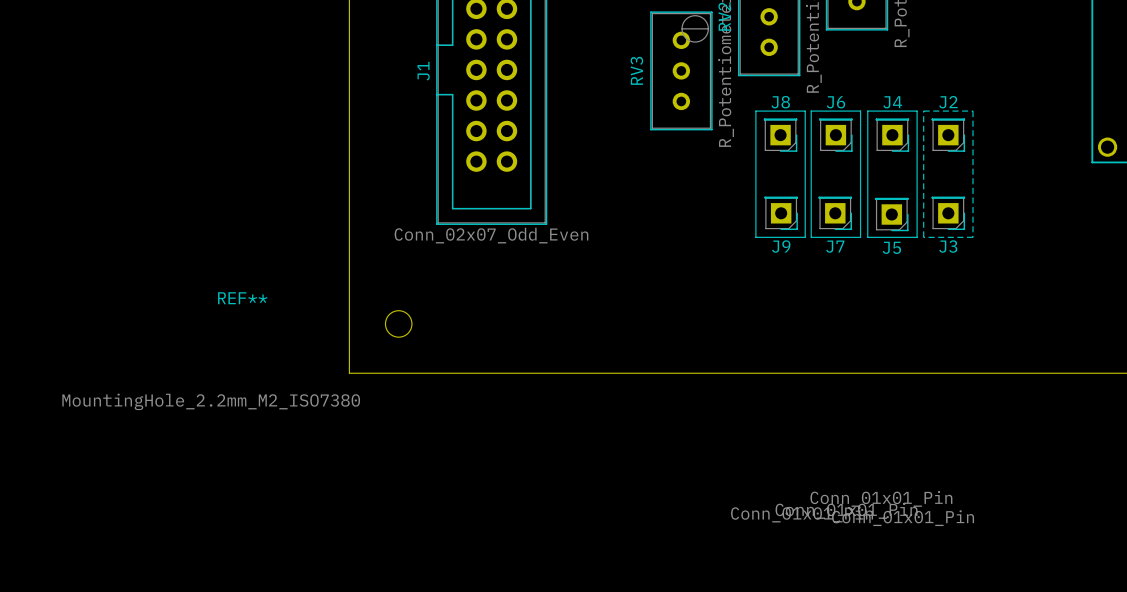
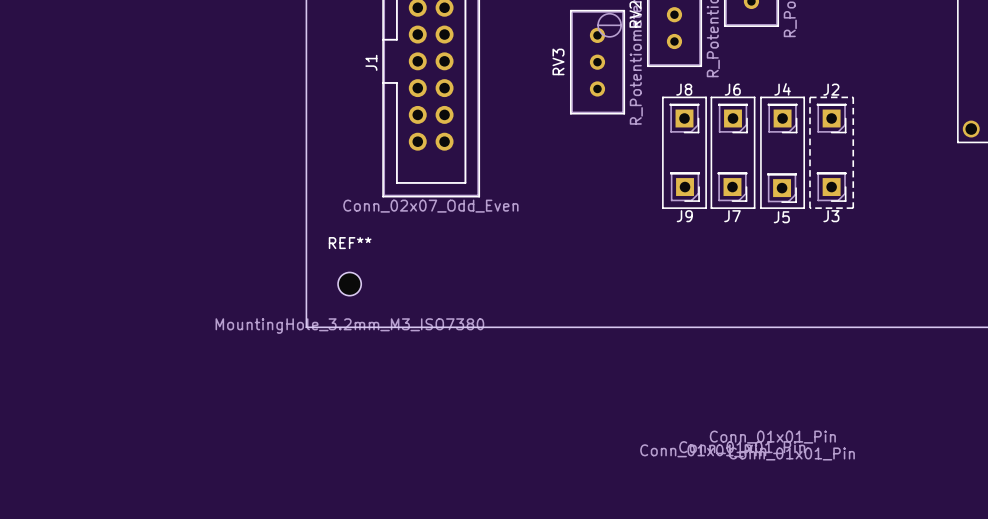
REF** name position: REF** (242, 298) -> REF** (350, 243)
REF** value: MountingHole_2.2mm_M2_ISO7380 (211, 401) -> MountingHole_3.2mm_M3_ISO7380 (349, 326)

